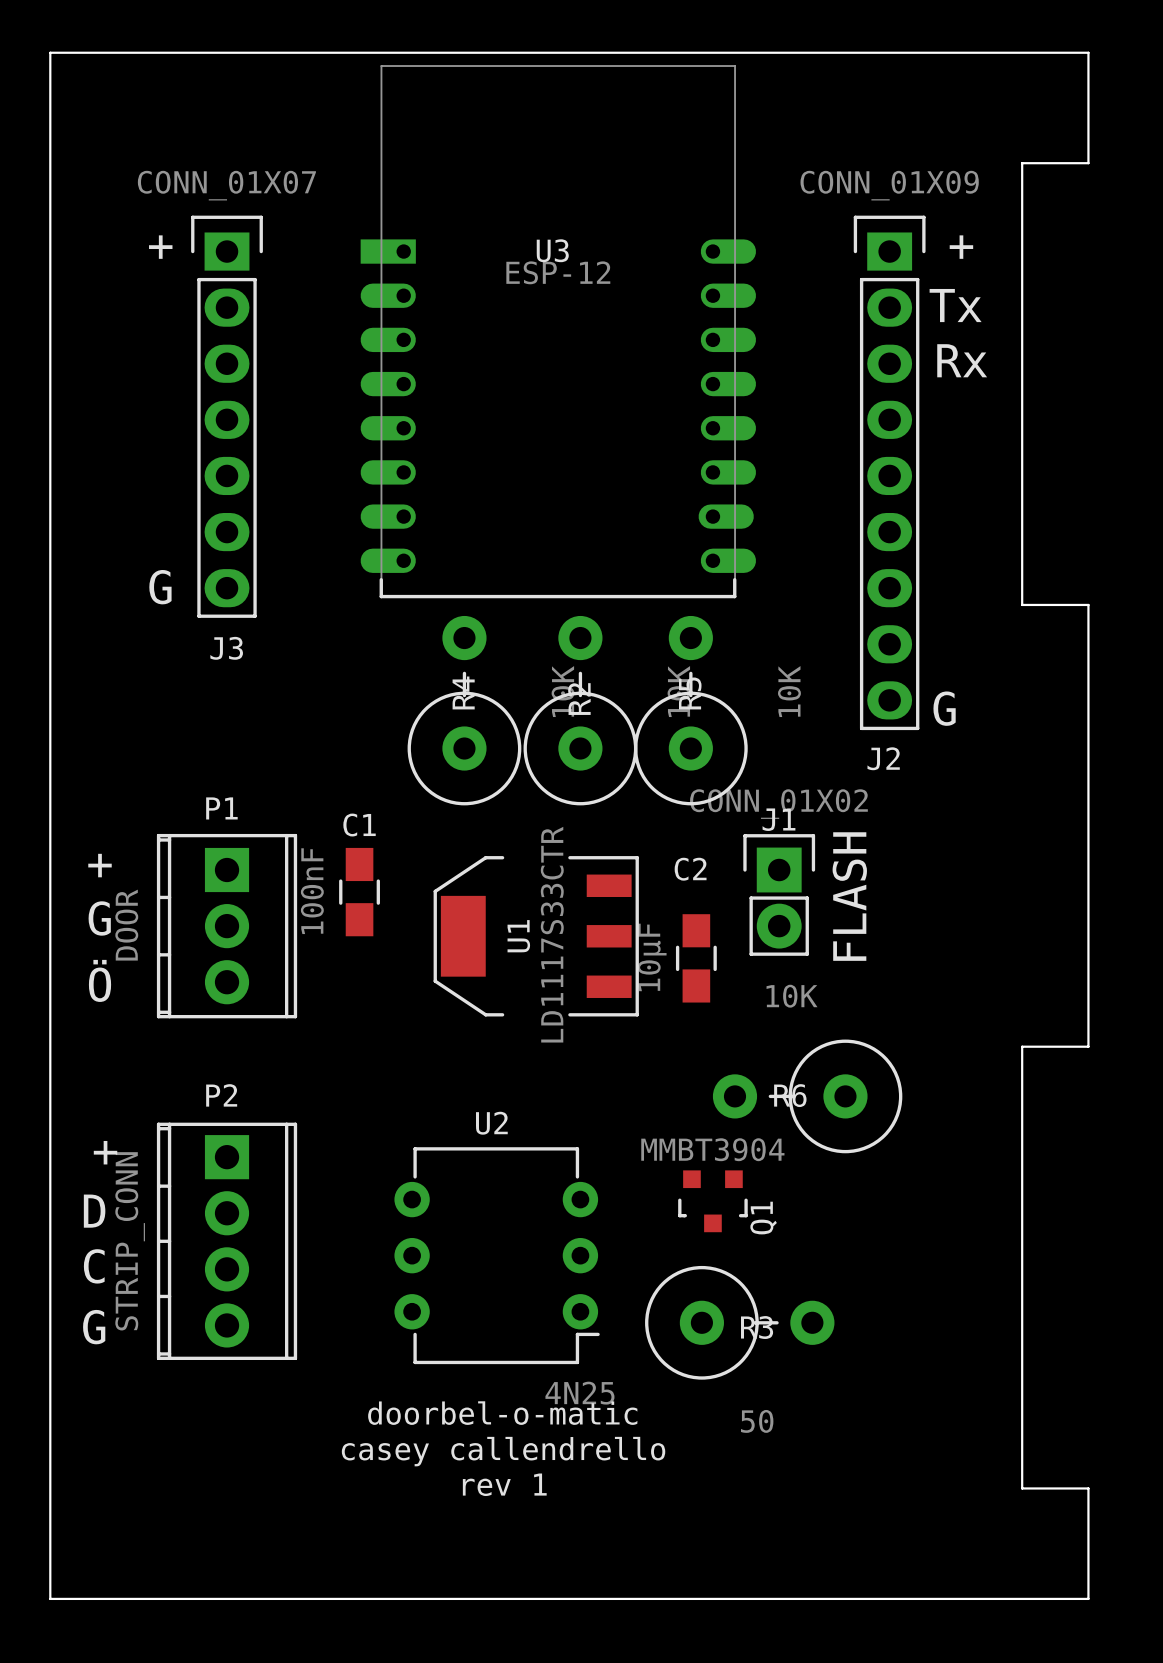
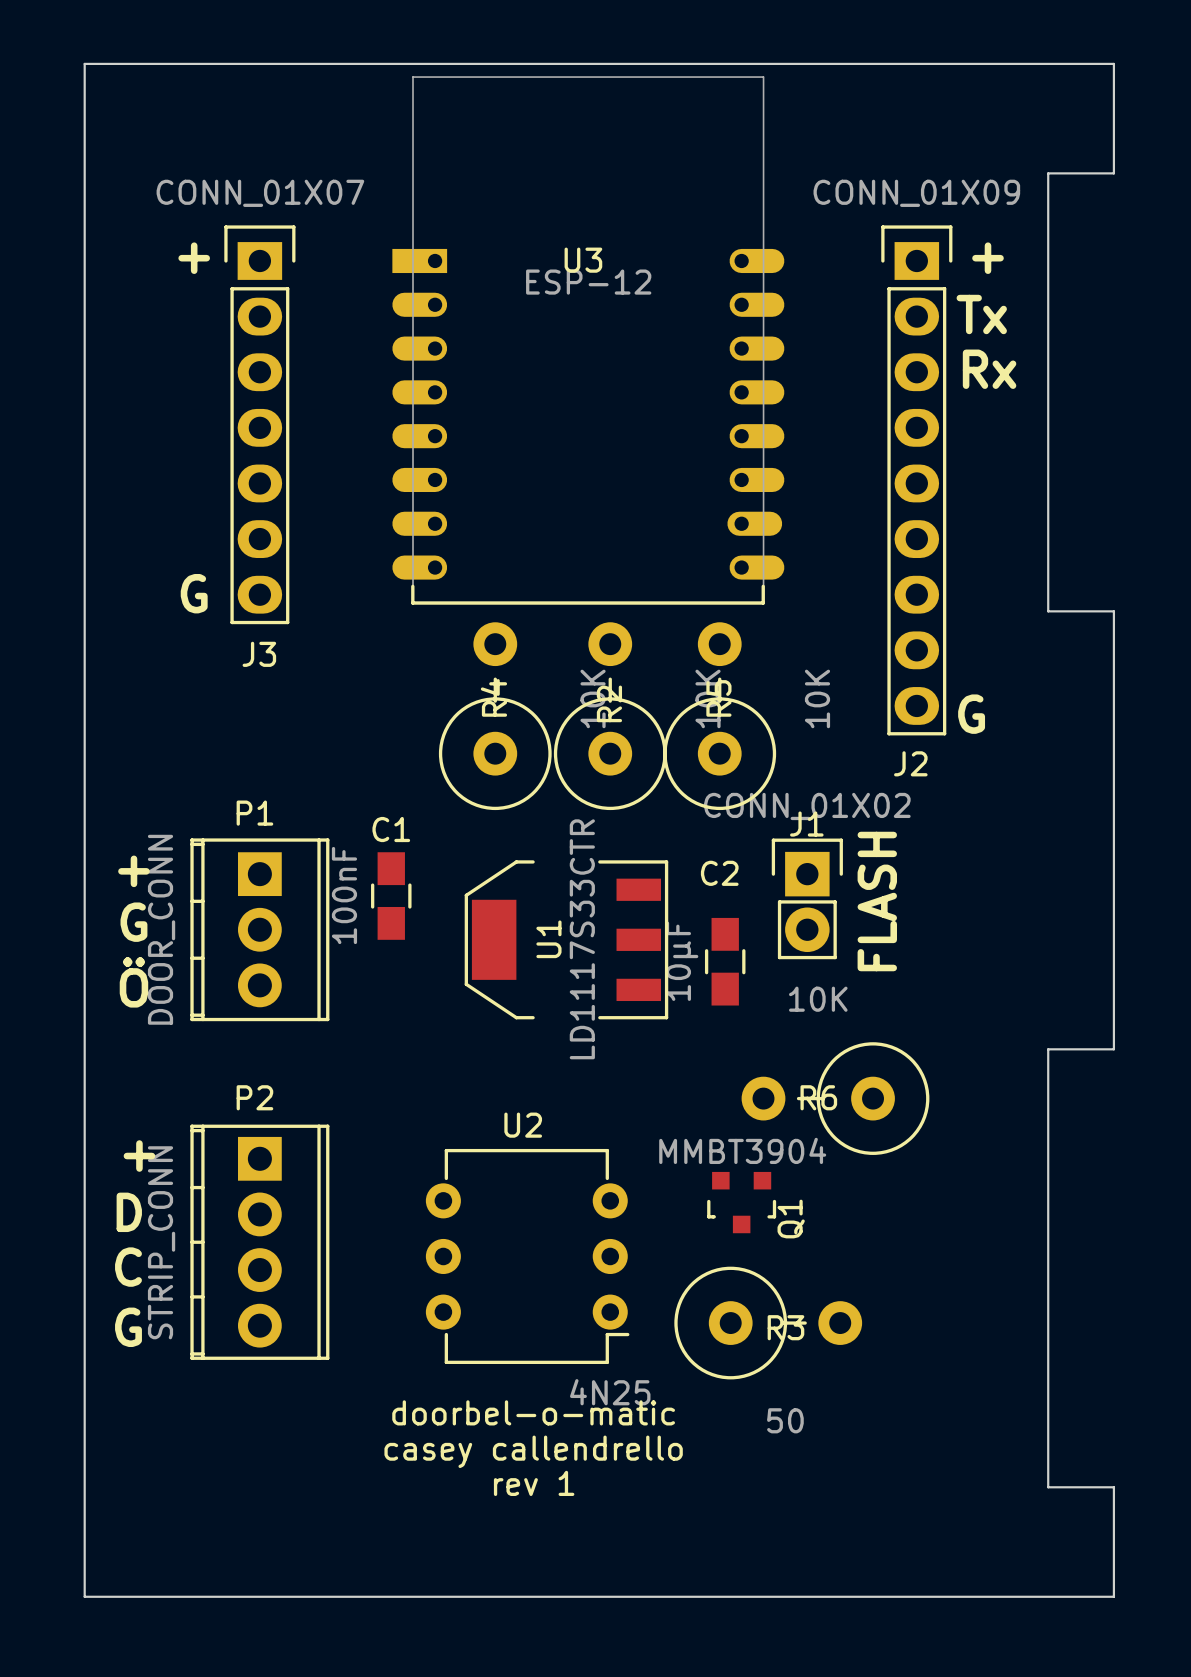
P1 value: DOOR (126, 925) -> DOOR_CONN (161, 929)

